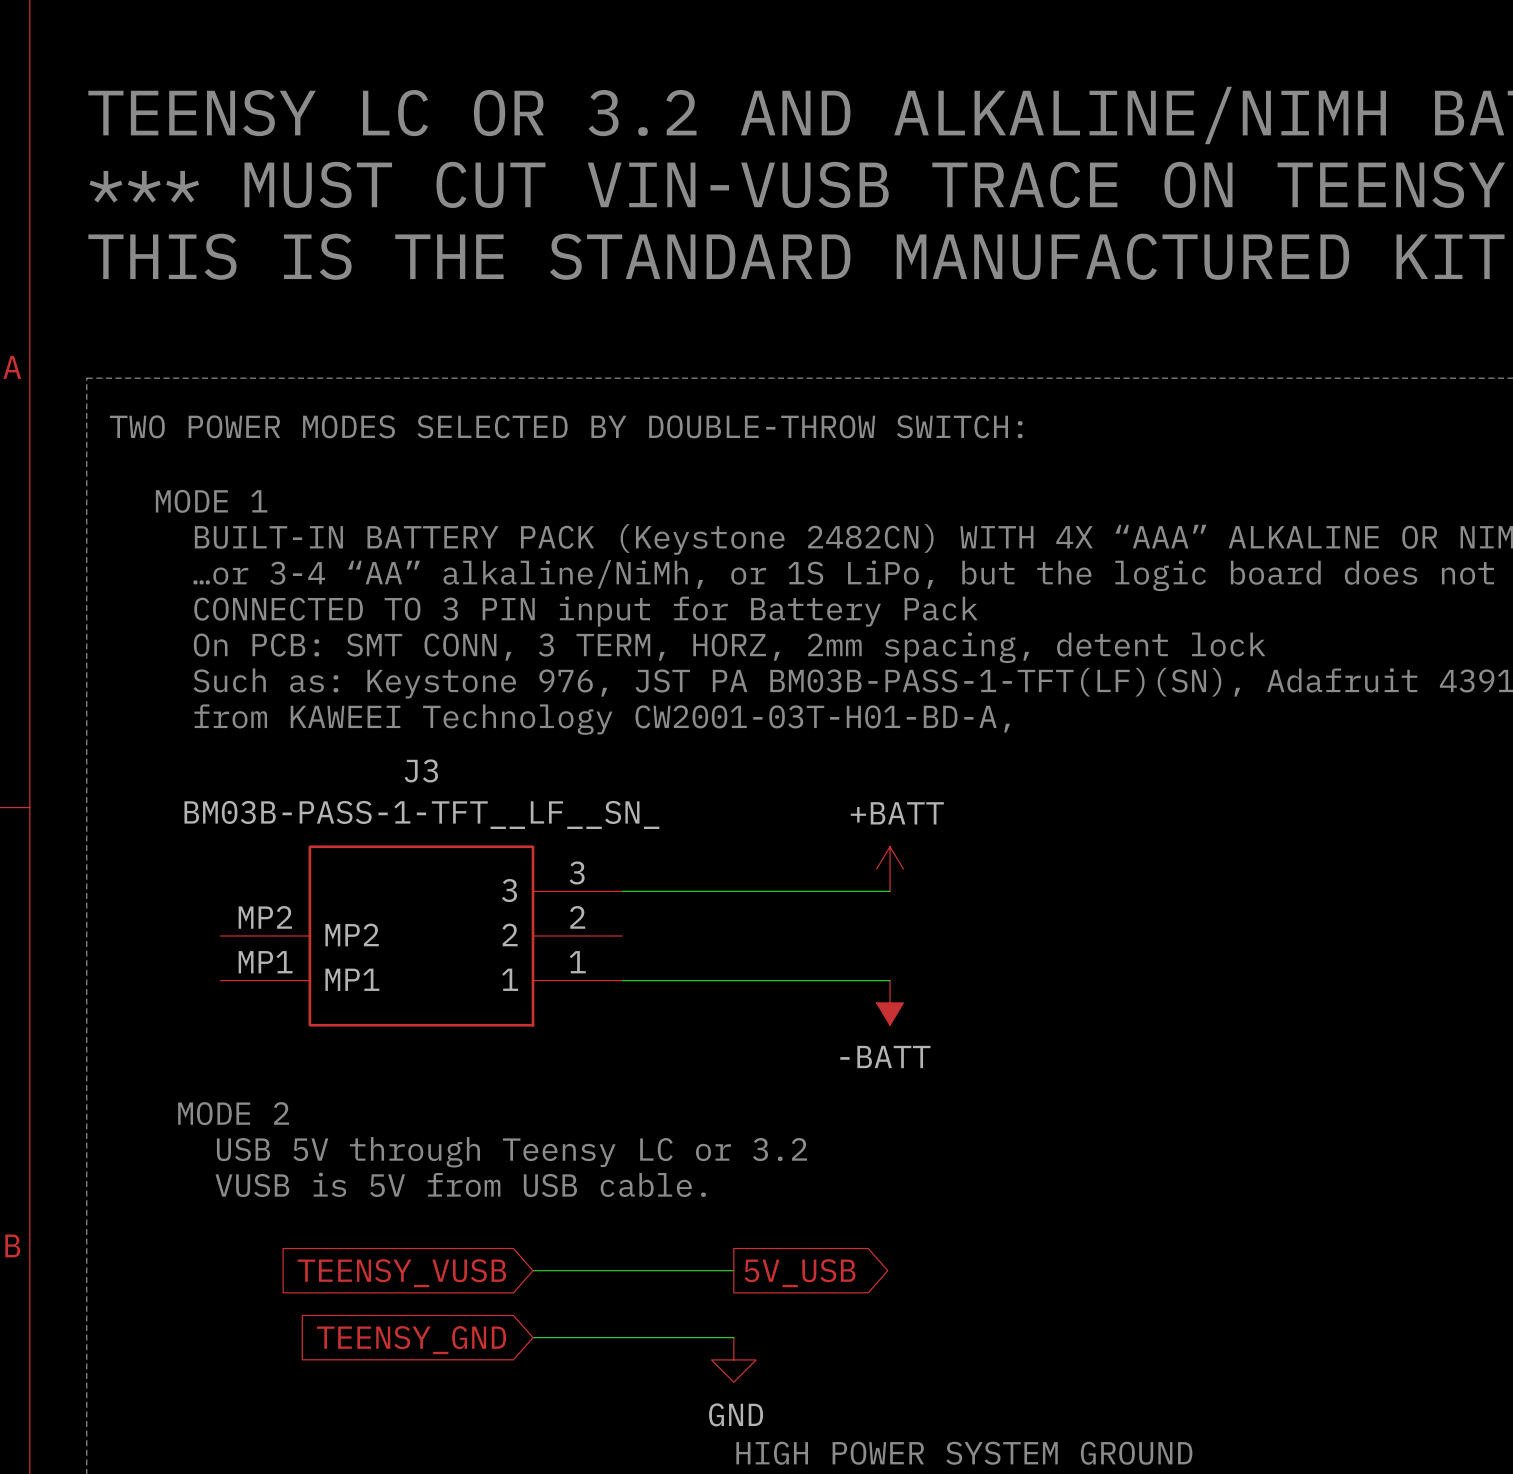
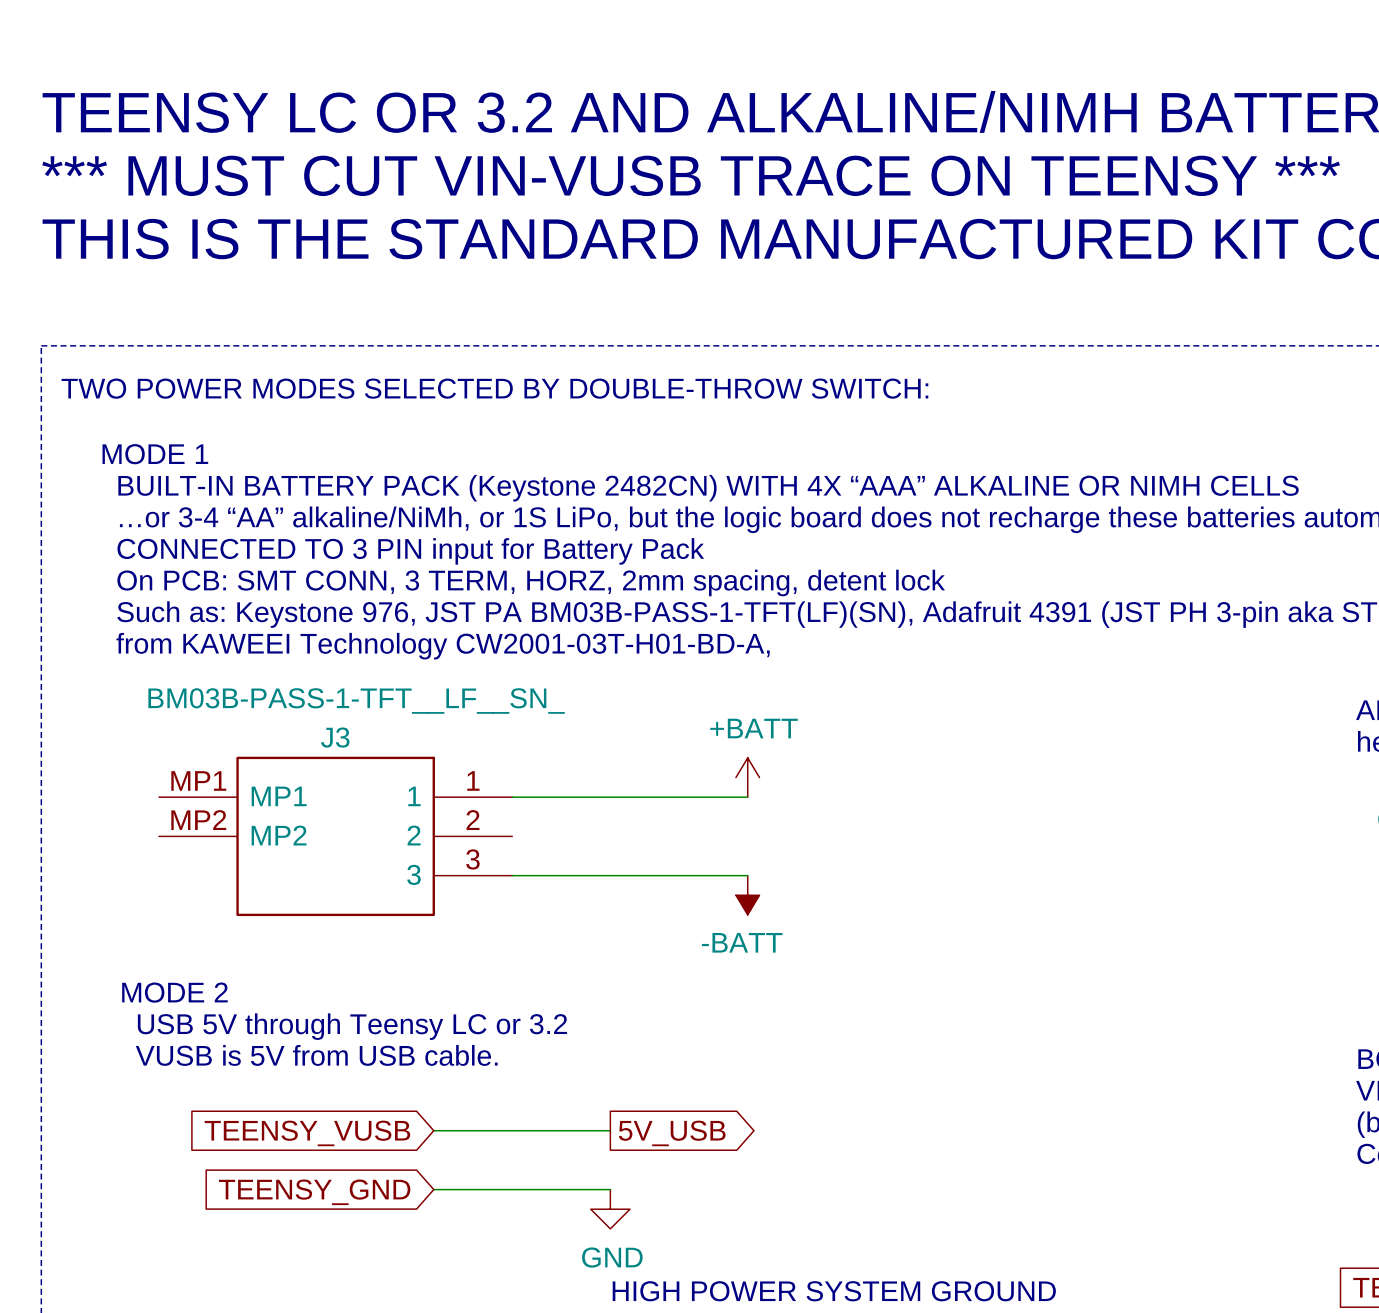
J3 name position: J3 (421, 770) -> J3 (335, 737)
J3 value position: BM03B-PASS-1-TFT__LF__SN_ (421, 814) -> BM03B-PASS-1-TFT__LF__SN_ (356, 701)
J3 flip: as is (421, 936) -> up-down (335, 836)

